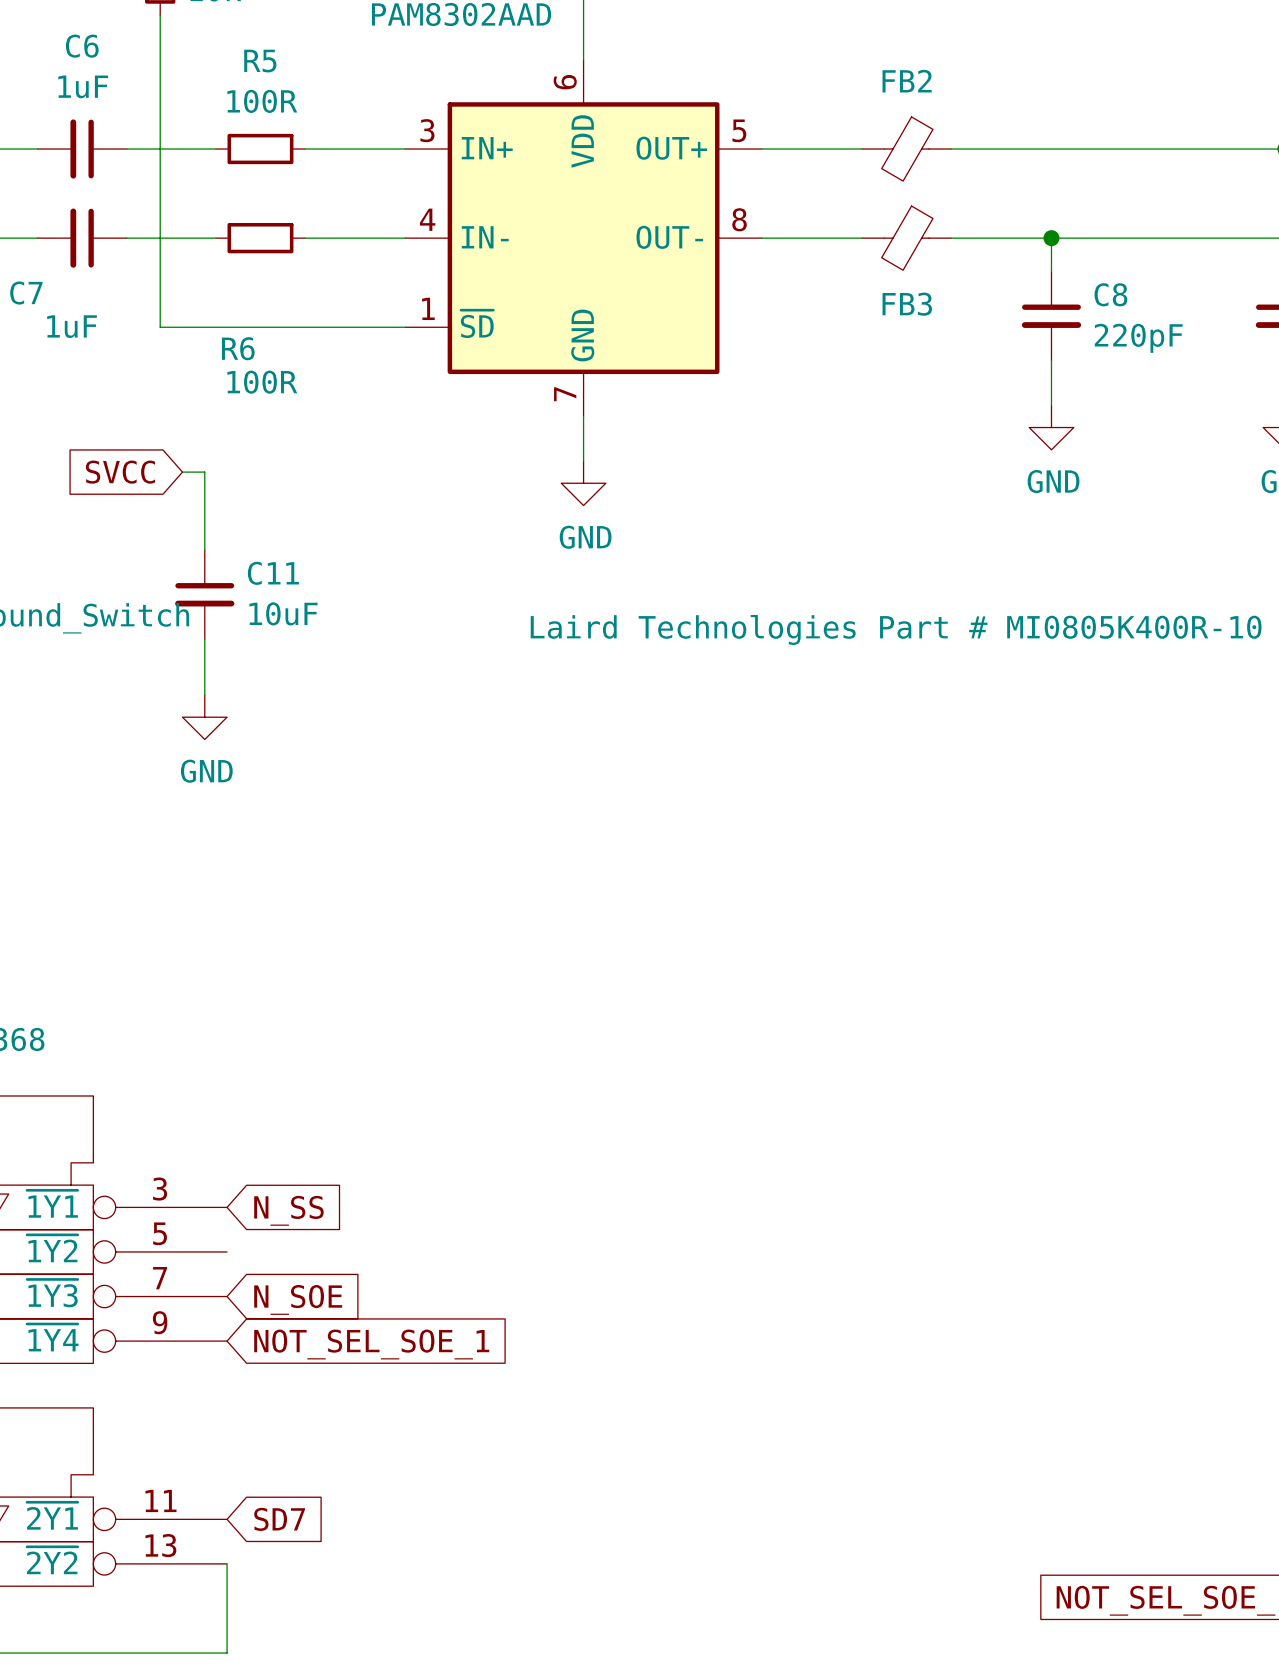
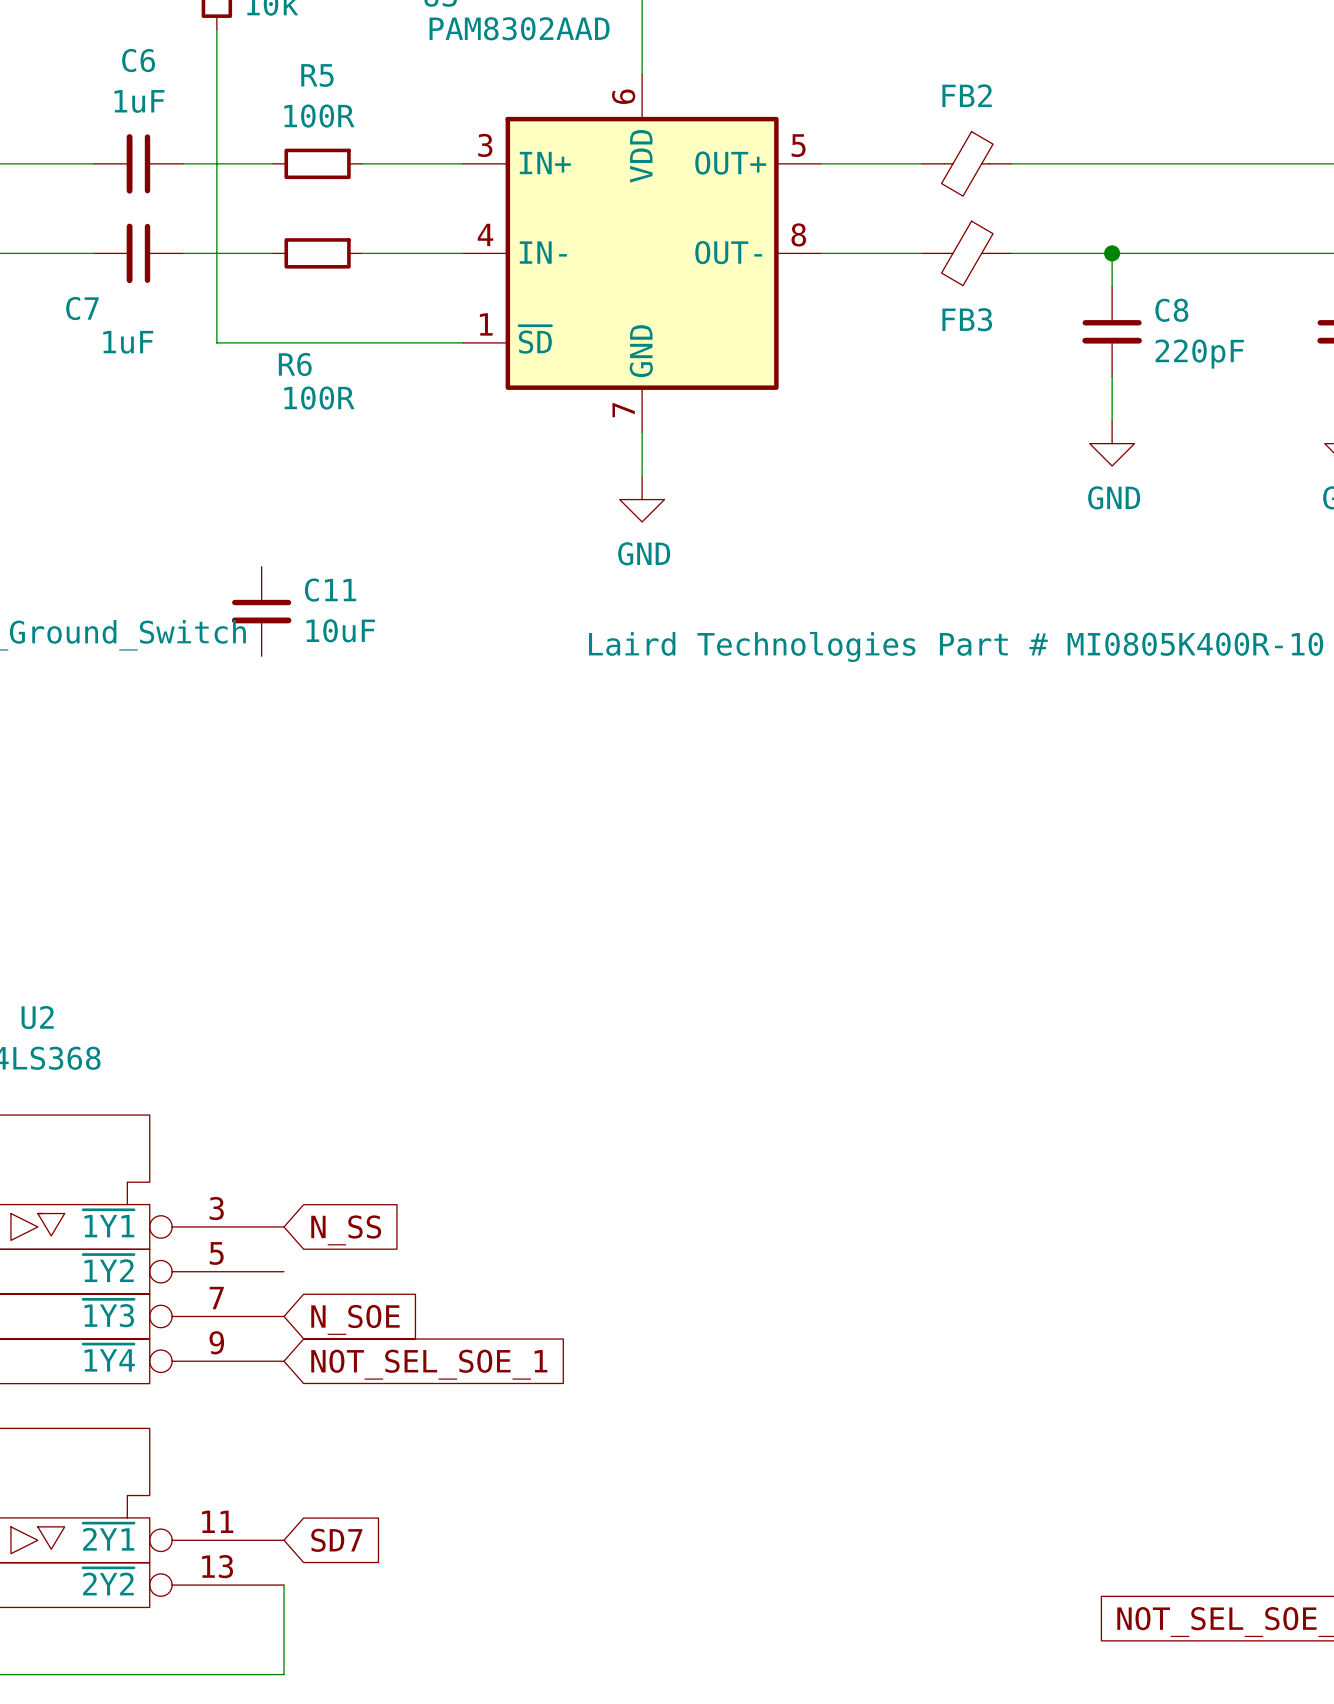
global label: SVCC (120, 472) -> none
wire: (182, 472) (204, 472) (204, 550) -> none
wire: (204, 639) (204, 694) -> none
power symbol: GND (204, 717) -> none

